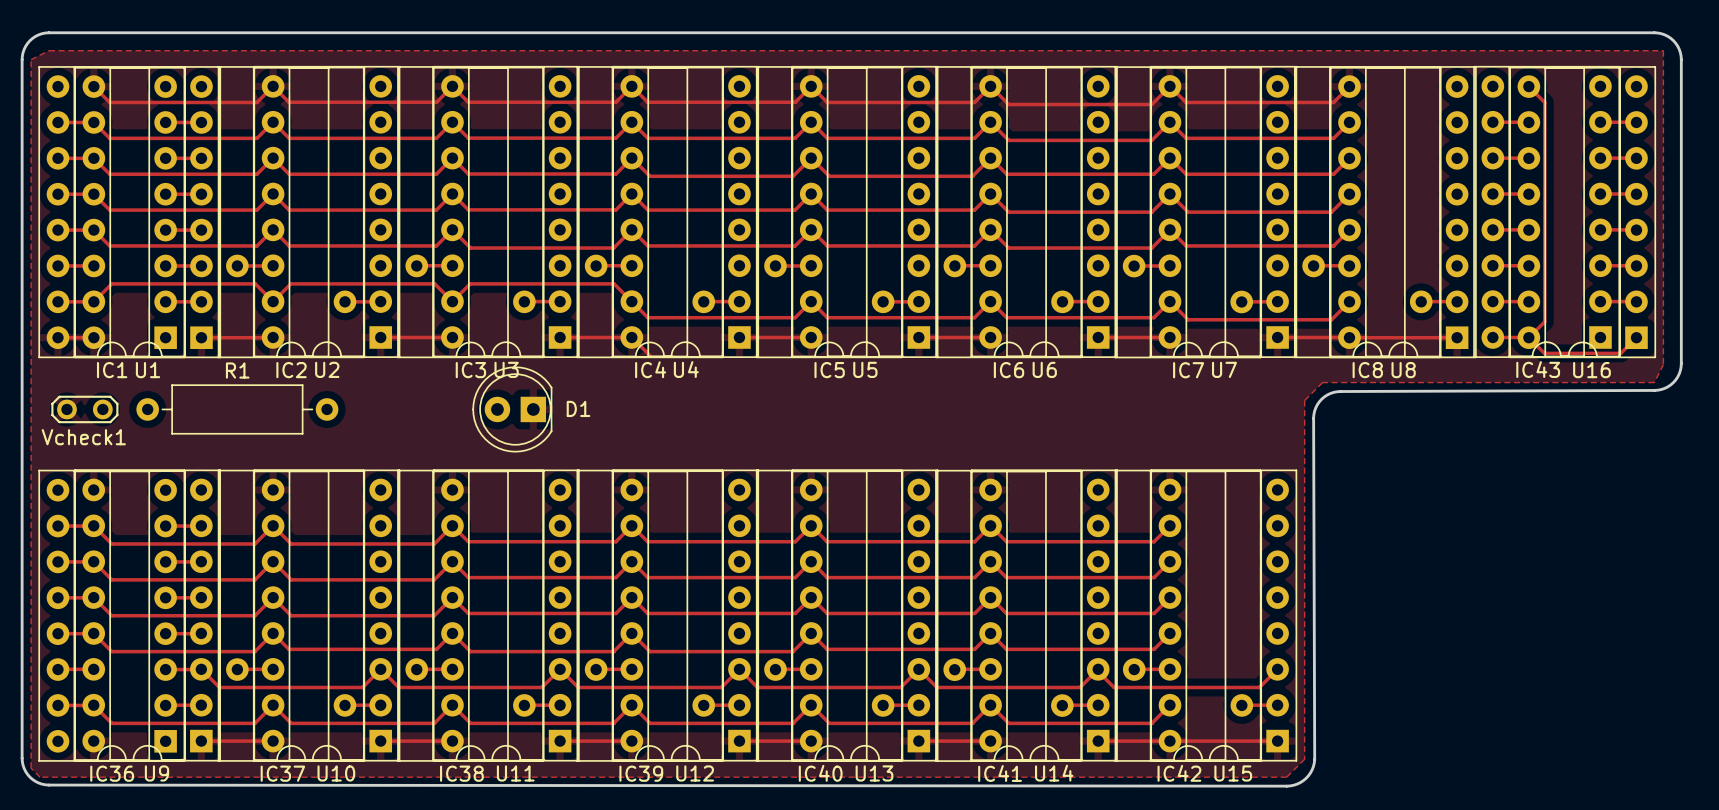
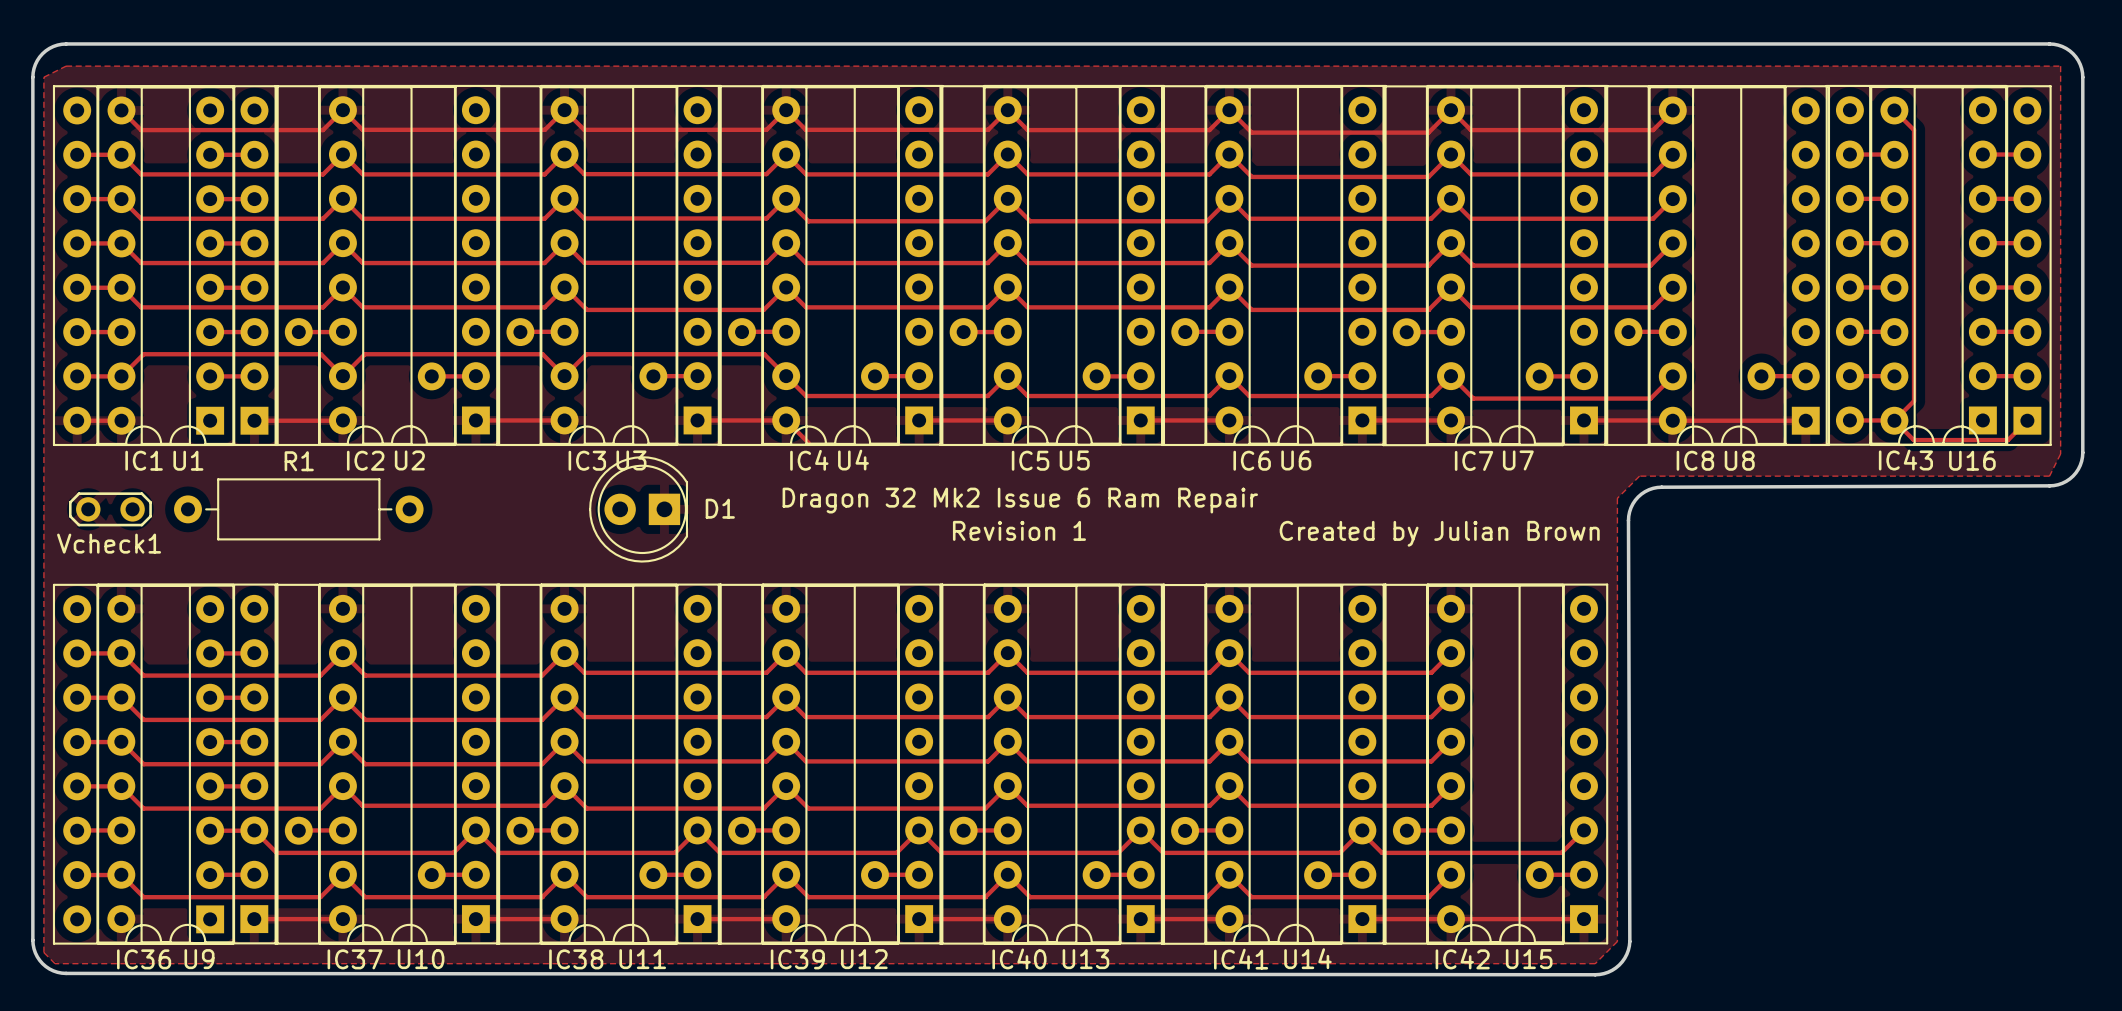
text: none -> Dragon 32 Mk2 Issue 6 Ram Repair (1020, 500)
text: none -> Revision 1 (1019, 530)
text: none -> Created by Julian Brown (1439, 533)

